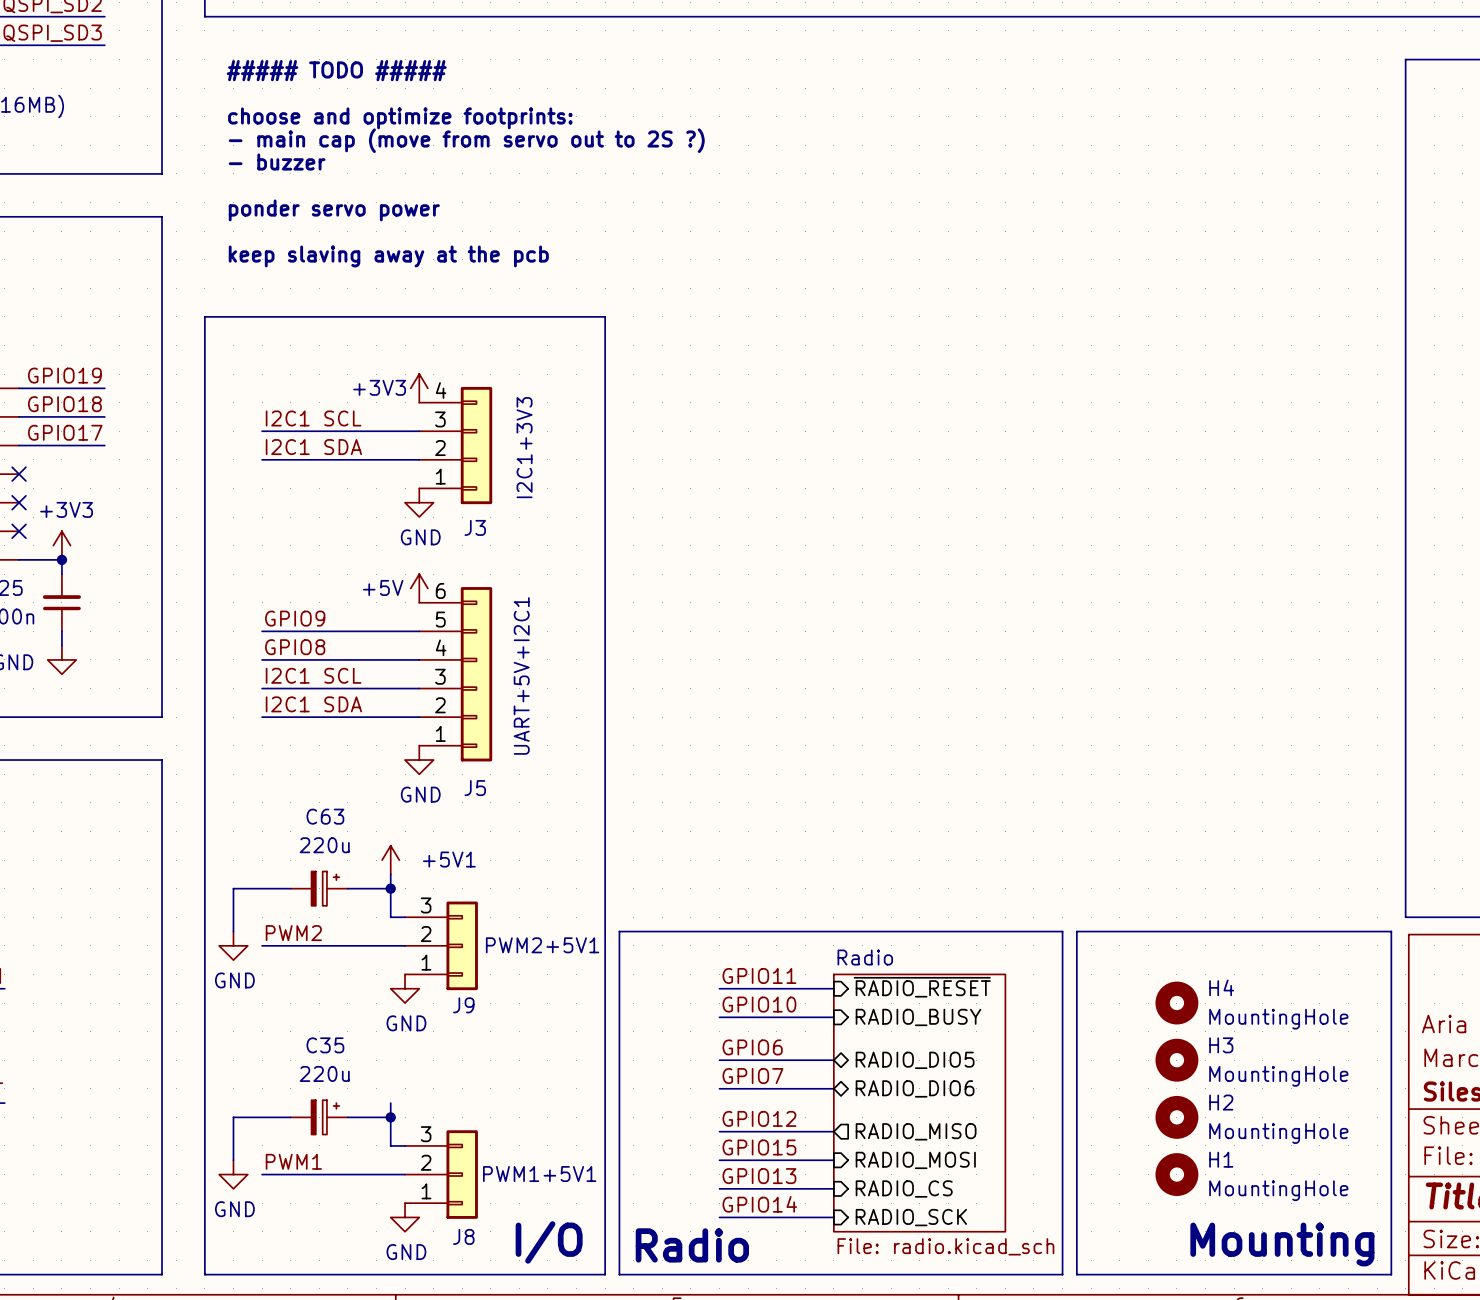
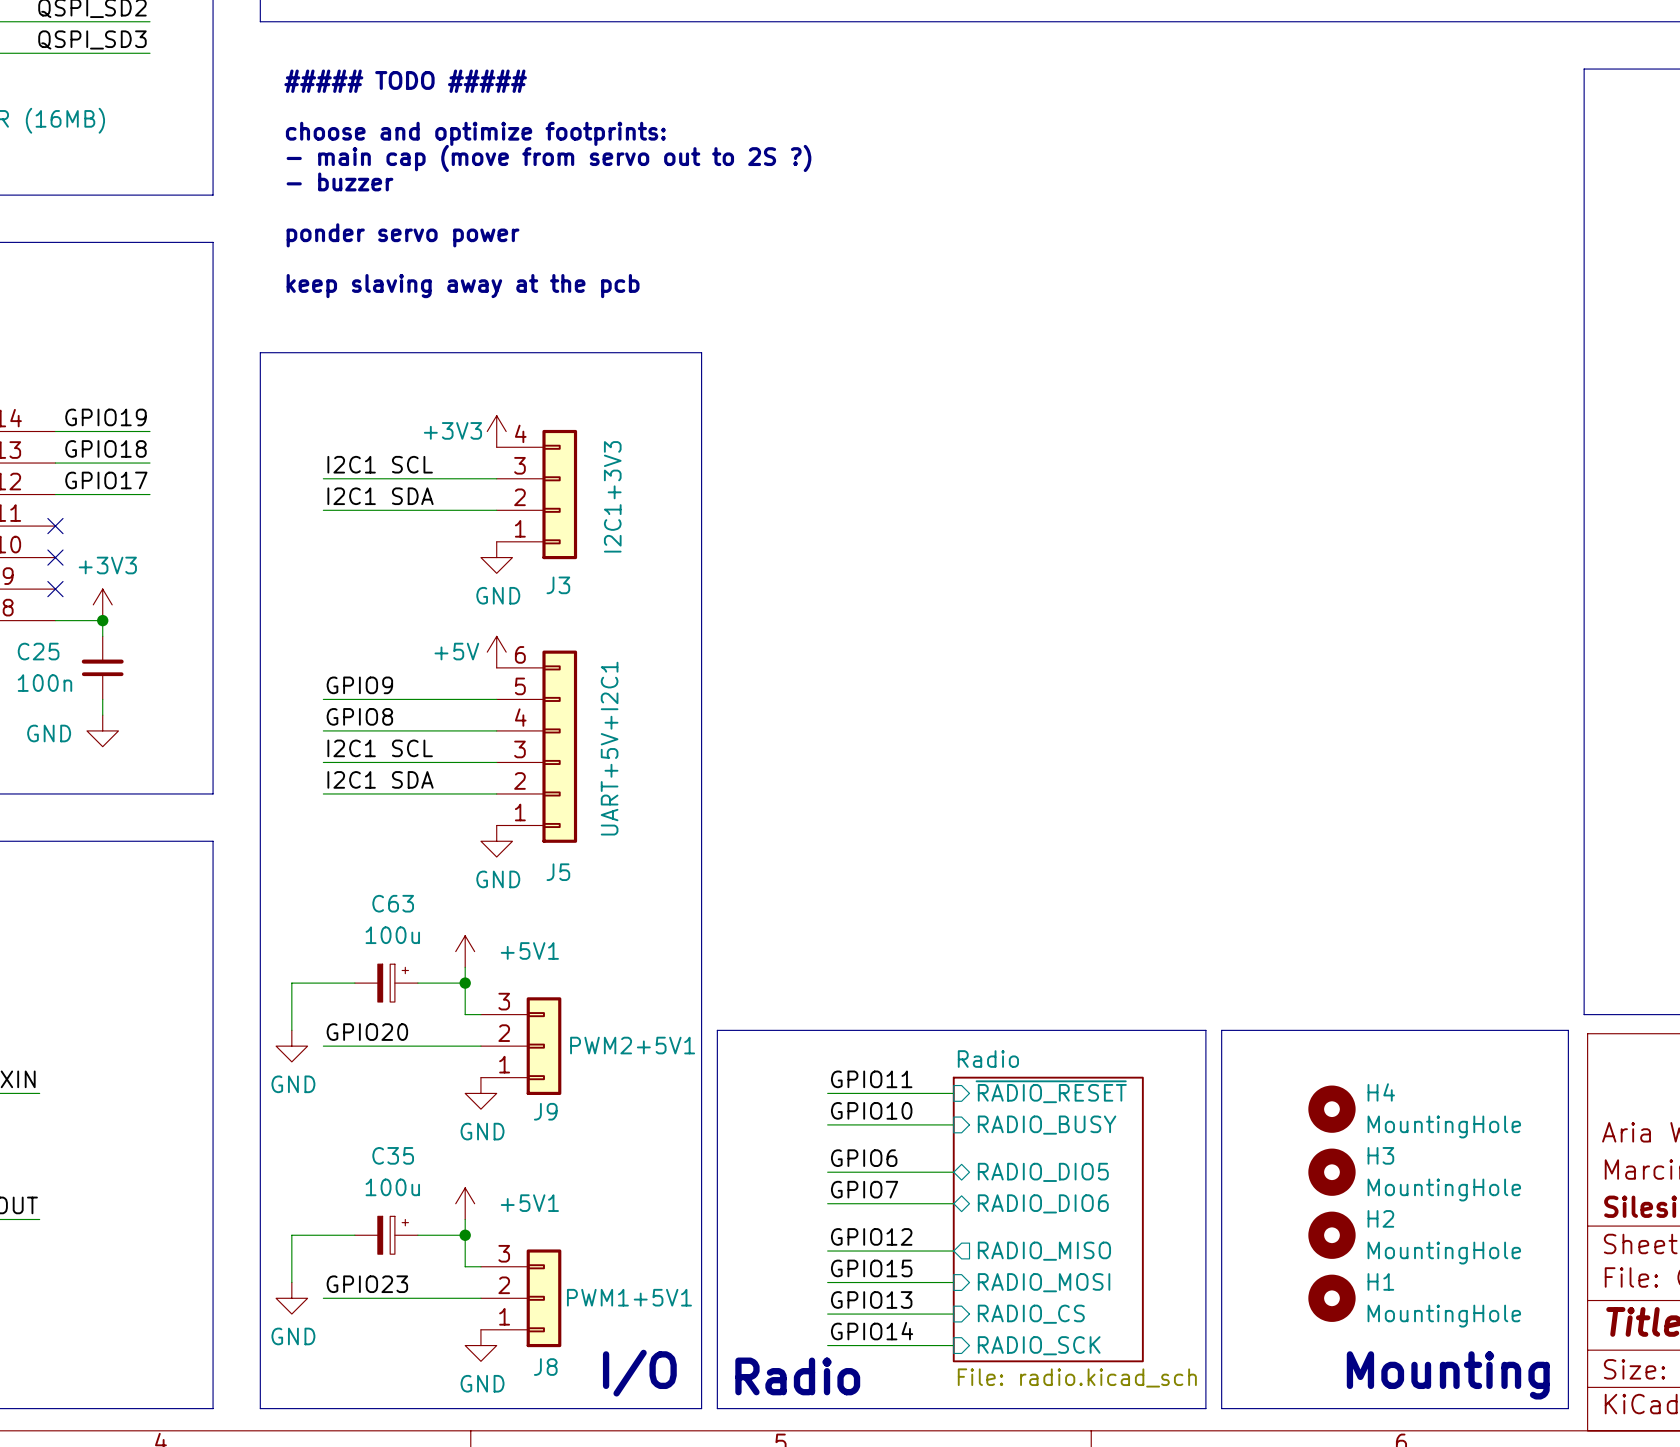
C63 value: 220u (324, 845) -> 100u (392, 935)
label: PWM2 (293, 933) -> GPIO20 (367, 1032)
C35 value: 220u (324, 1073) -> 100u (392, 1187)
power symbol: none -> +5V1 (465, 1203)
label: PWM1 (293, 1161) -> GPIO23 (367, 1284)

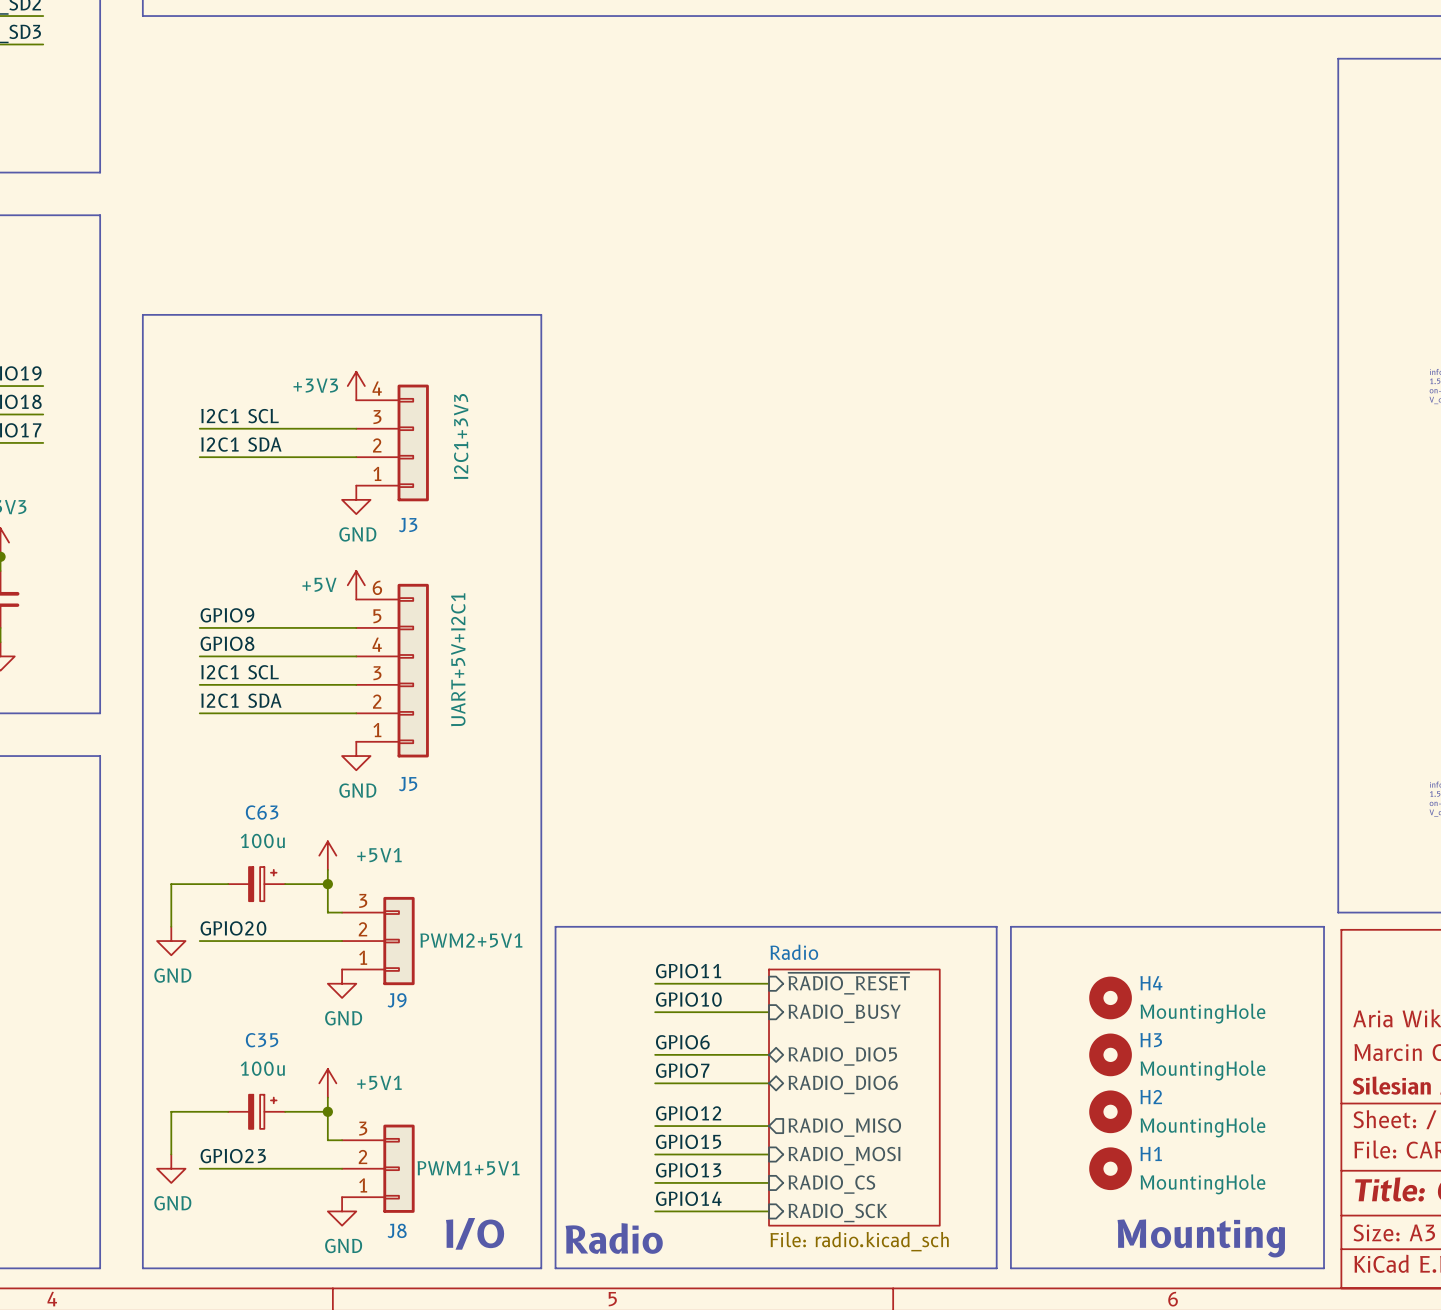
text: ##### TODO ##### (405, 81) -> none
text: choose and optimize footprints: (475, 133) -> none
text: - main cap (move from servo out to 2S ?) (548, 158) -> none
text: - buzzer (339, 181) -> none
text: ponder servo power (403, 235) -> none
text: keep slaving away at the pcb (463, 286) -> none

